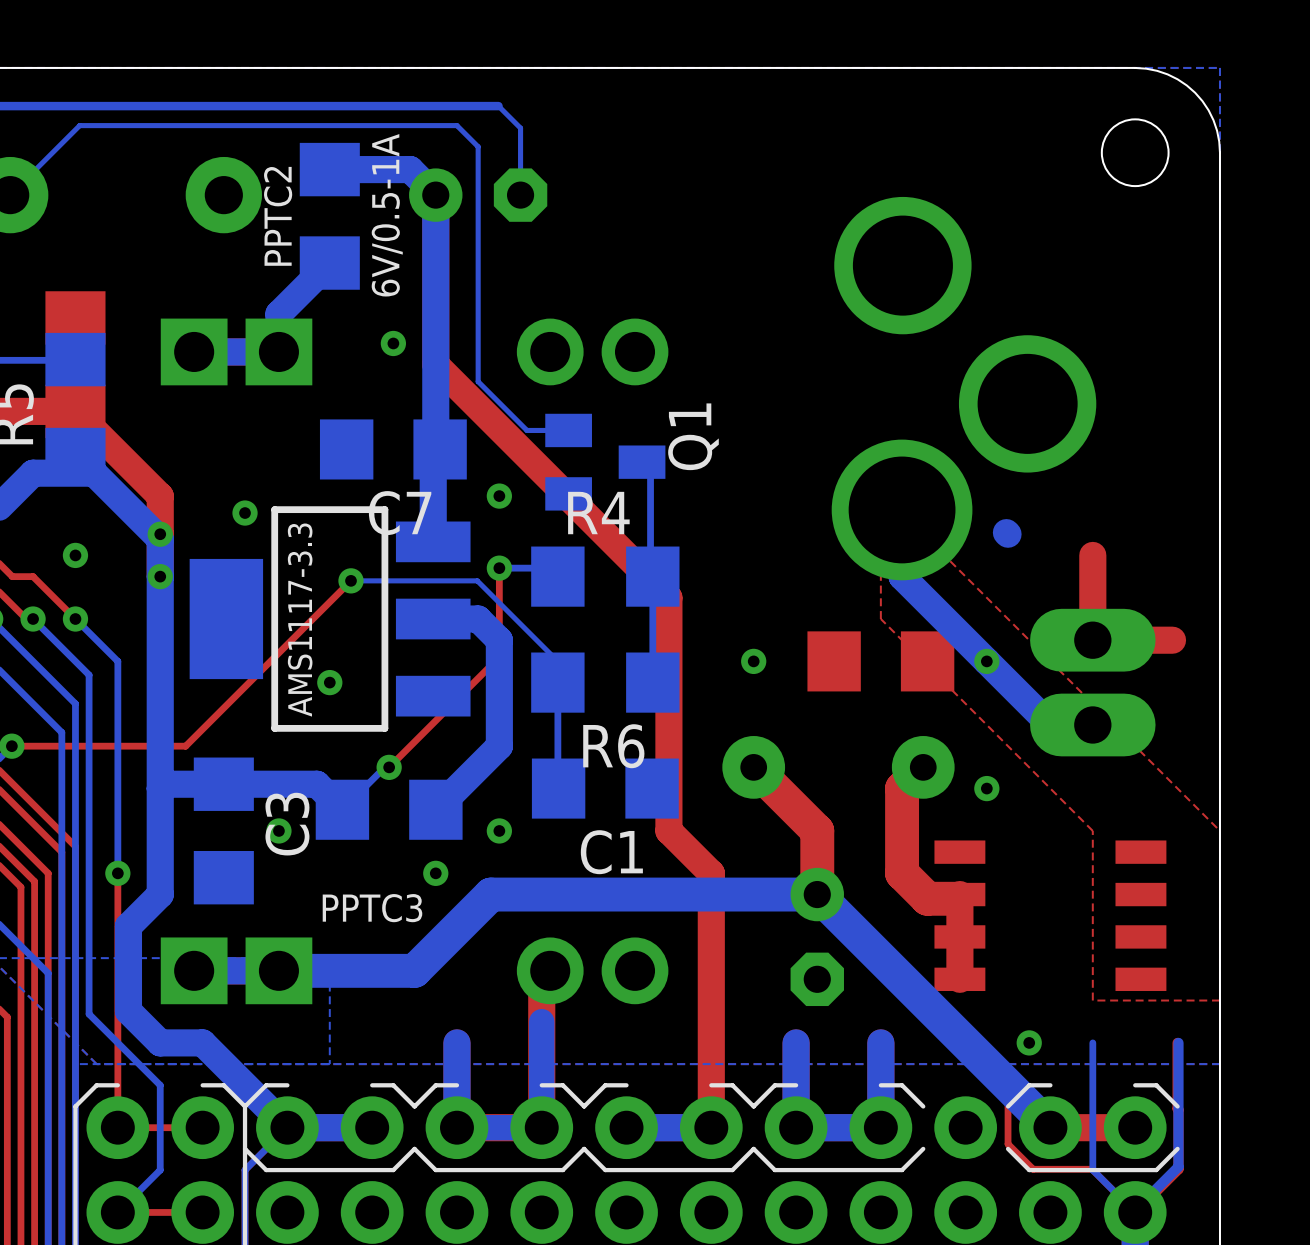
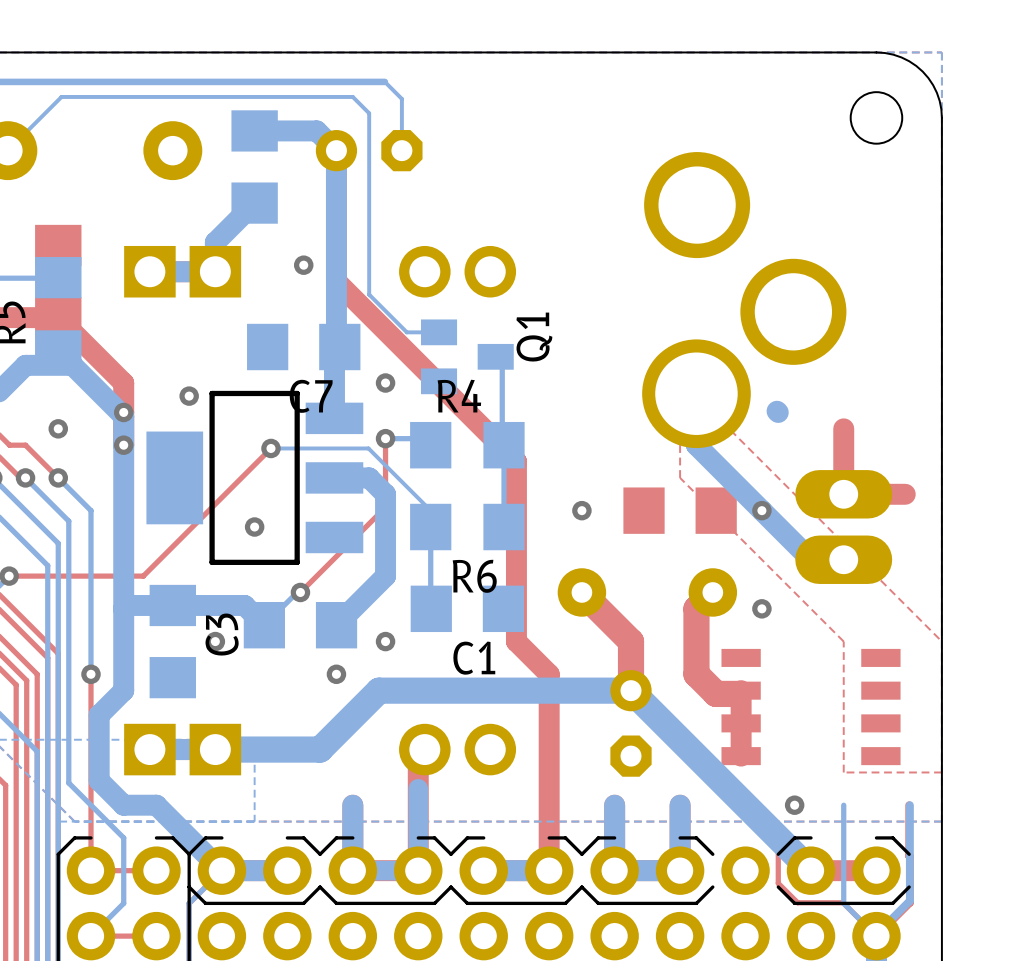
PPTC2 value: 6V/0.5-1A (387, 215) -> none
PPTC2 name: PPTC2 (278, 216) -> none
AMS1117-3.3 name: AMS1117-3.3 (300, 620) -> none
PPTC3 name: PPTC3 (372, 908) -> none

